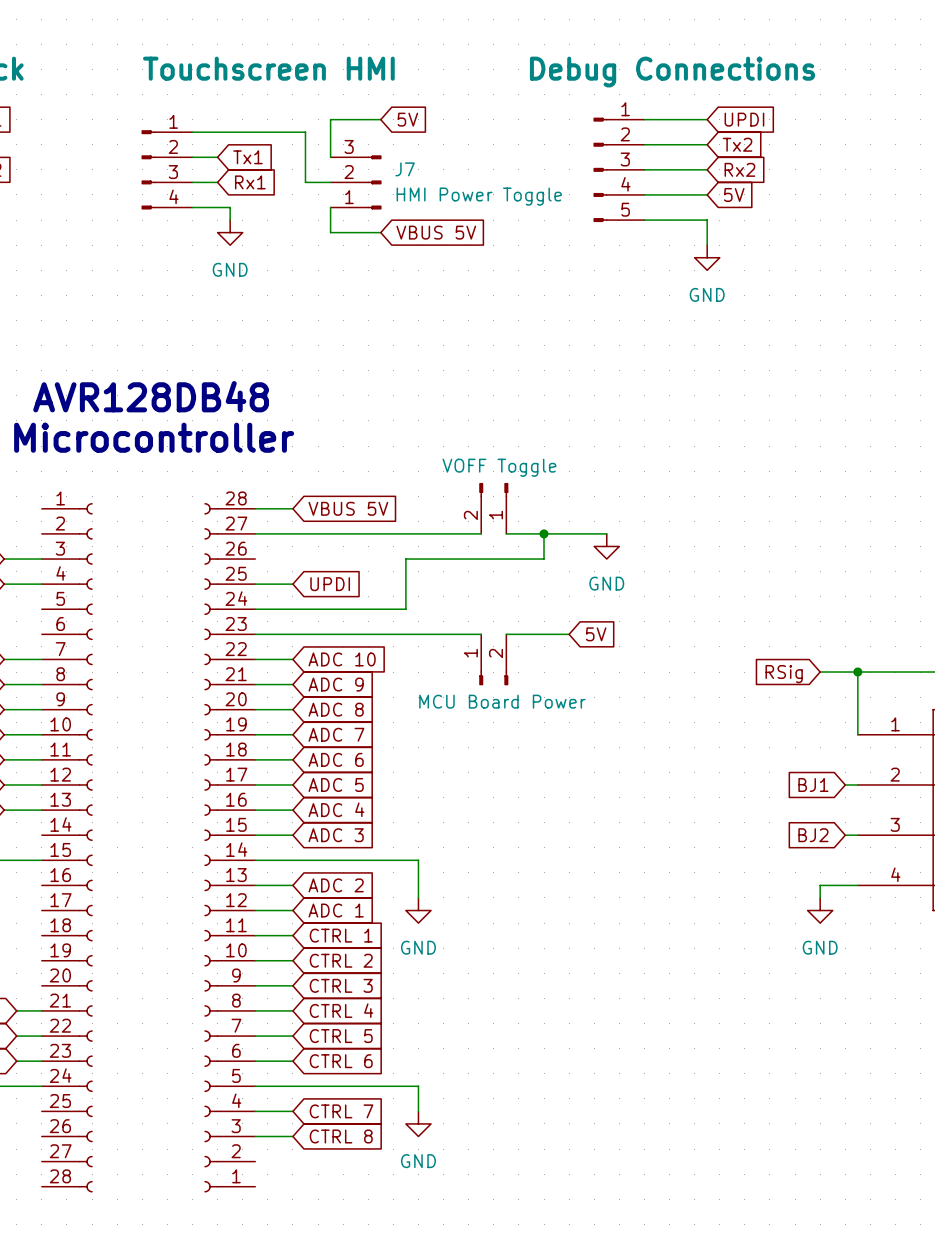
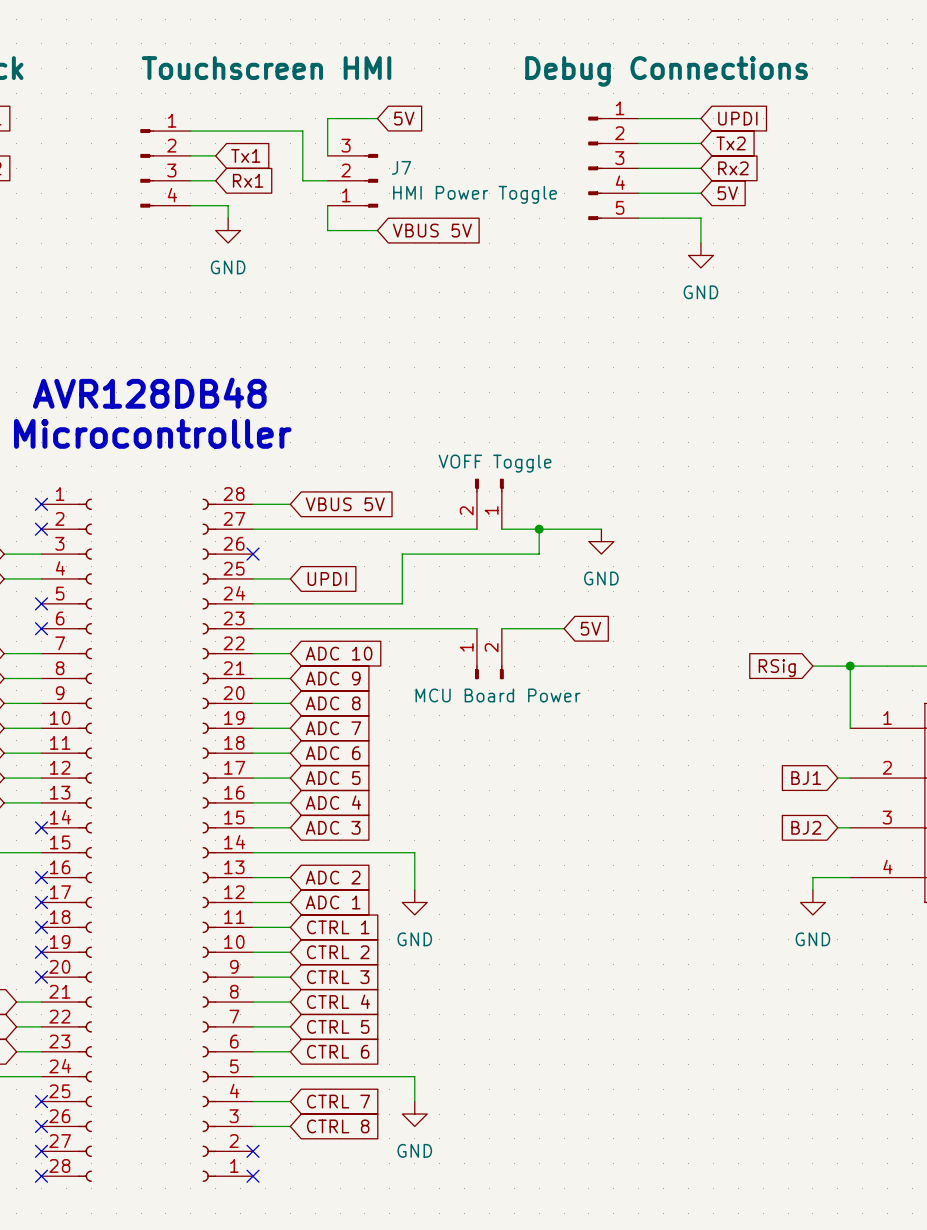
no-connect mark: none -> (41, 504)
no-connect mark: none -> (41, 529)
no-connect mark: none -> (253, 554)
no-connect mark: none -> (41, 603)
no-connect mark: none -> (41, 628)
no-connect mark: none -> (41, 827)
no-connect mark: none -> (41, 877)
no-connect mark: none -> (41, 902)
no-connect mark: none -> (41, 927)
no-connect mark: none -> (41, 952)
no-connect mark: none -> (41, 977)
no-connect mark: none -> (41, 1101)
no-connect mark: none -> (41, 1126)
no-connect mark: none -> (41, 1151)
no-connect mark: none -> (253, 1151)
no-connect mark: none -> (41, 1176)
no-connect mark: none -> (253, 1176)

